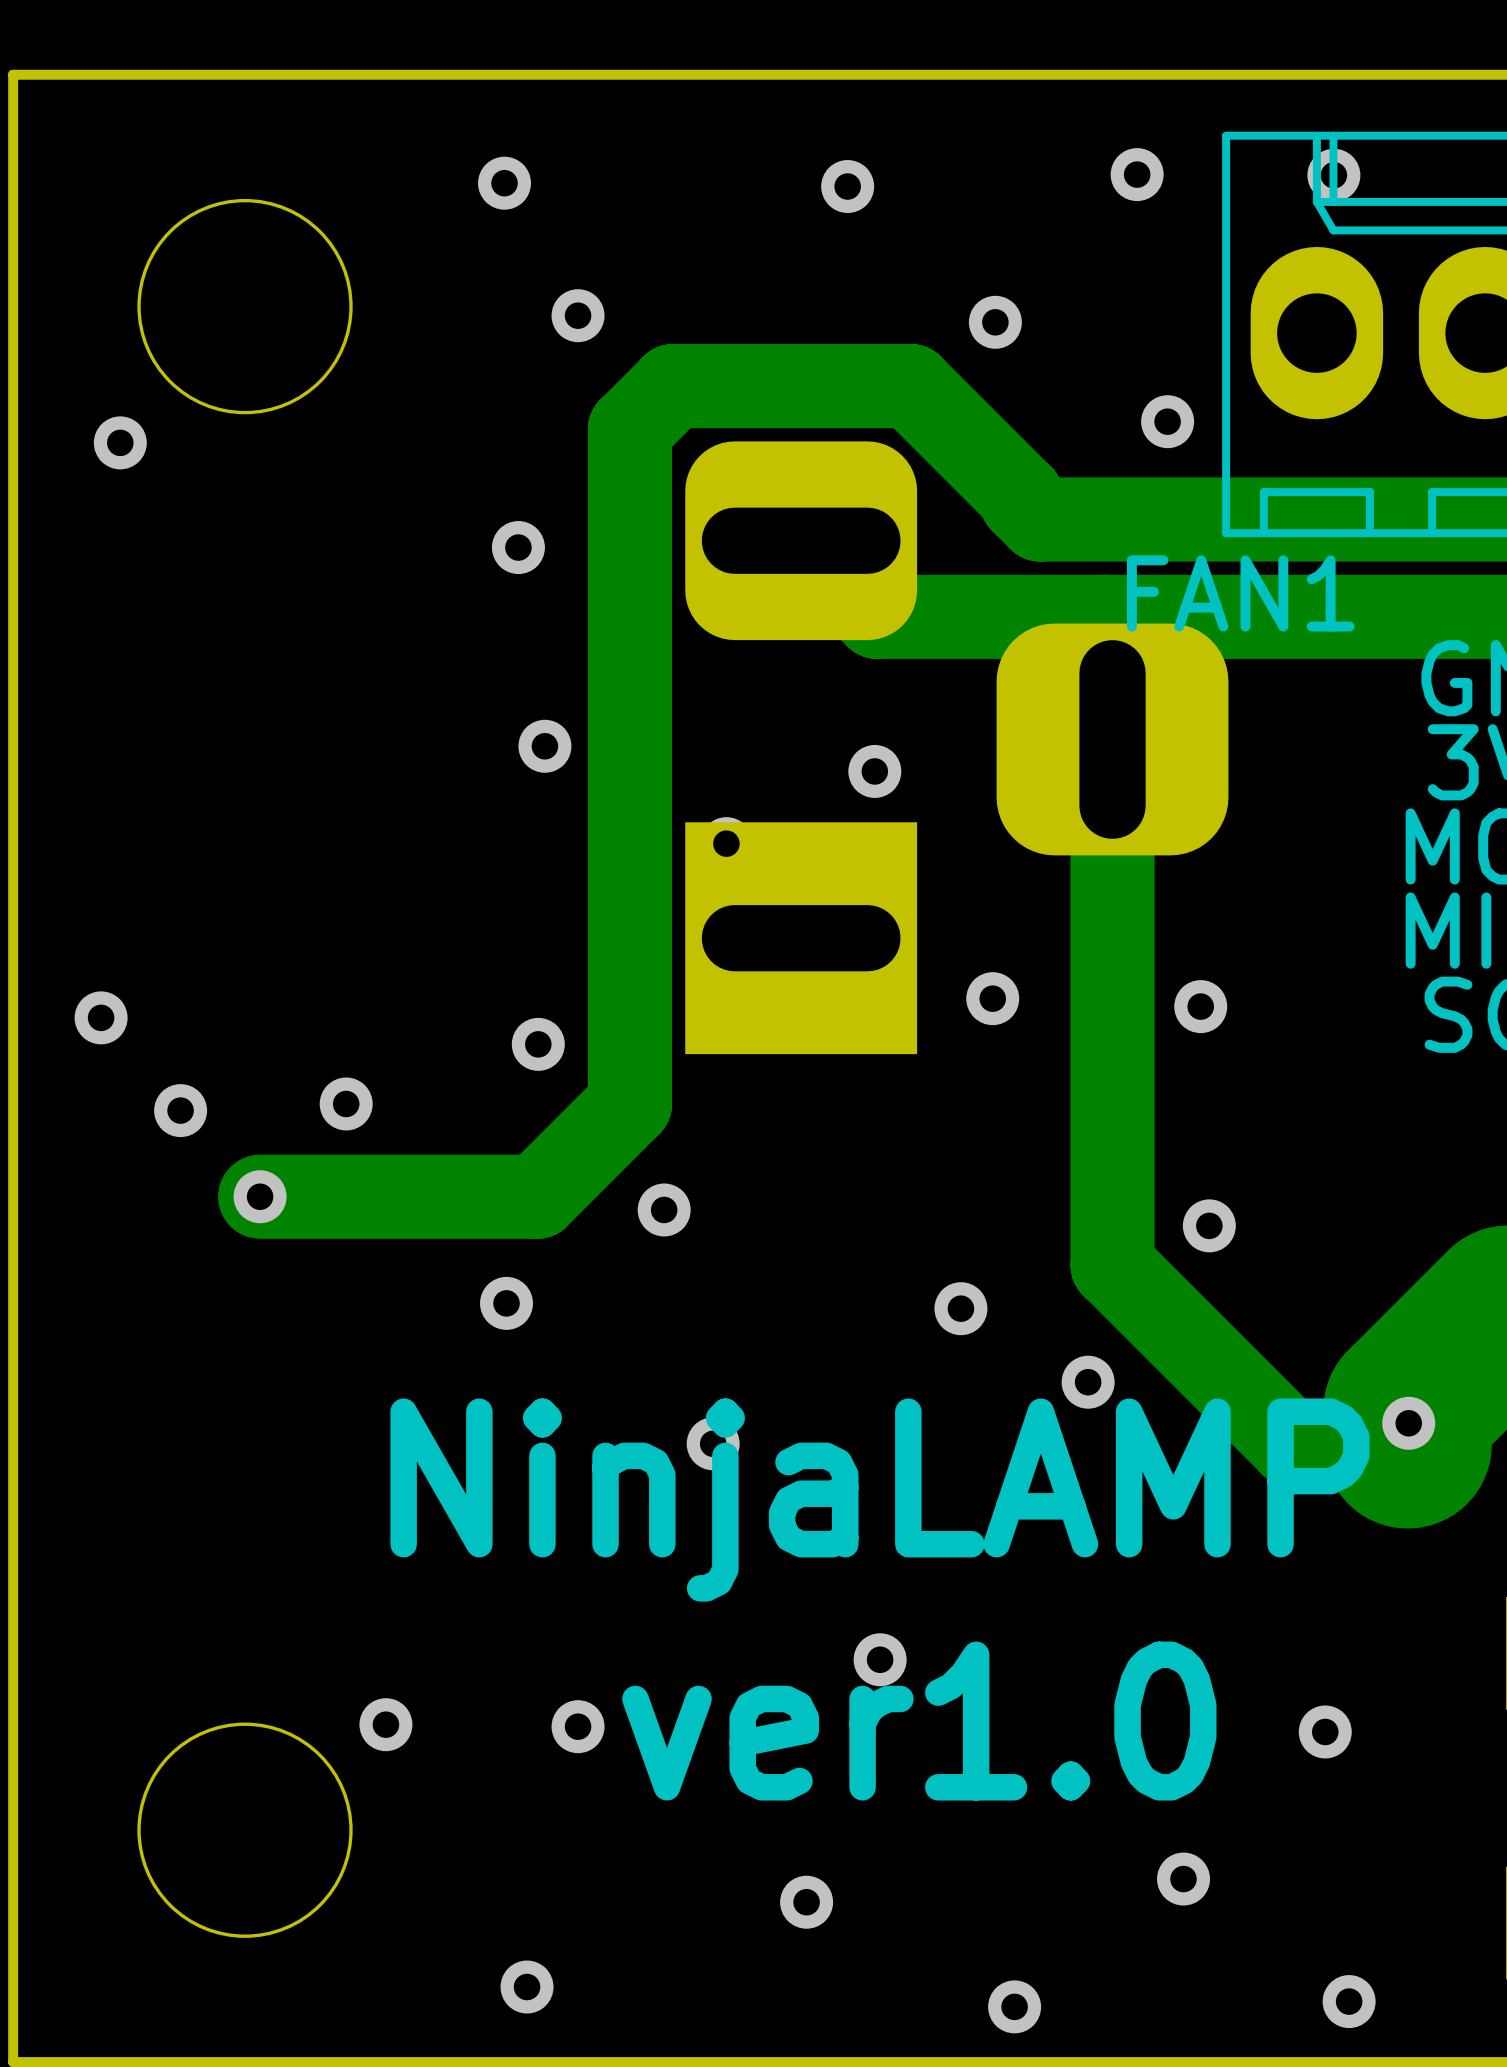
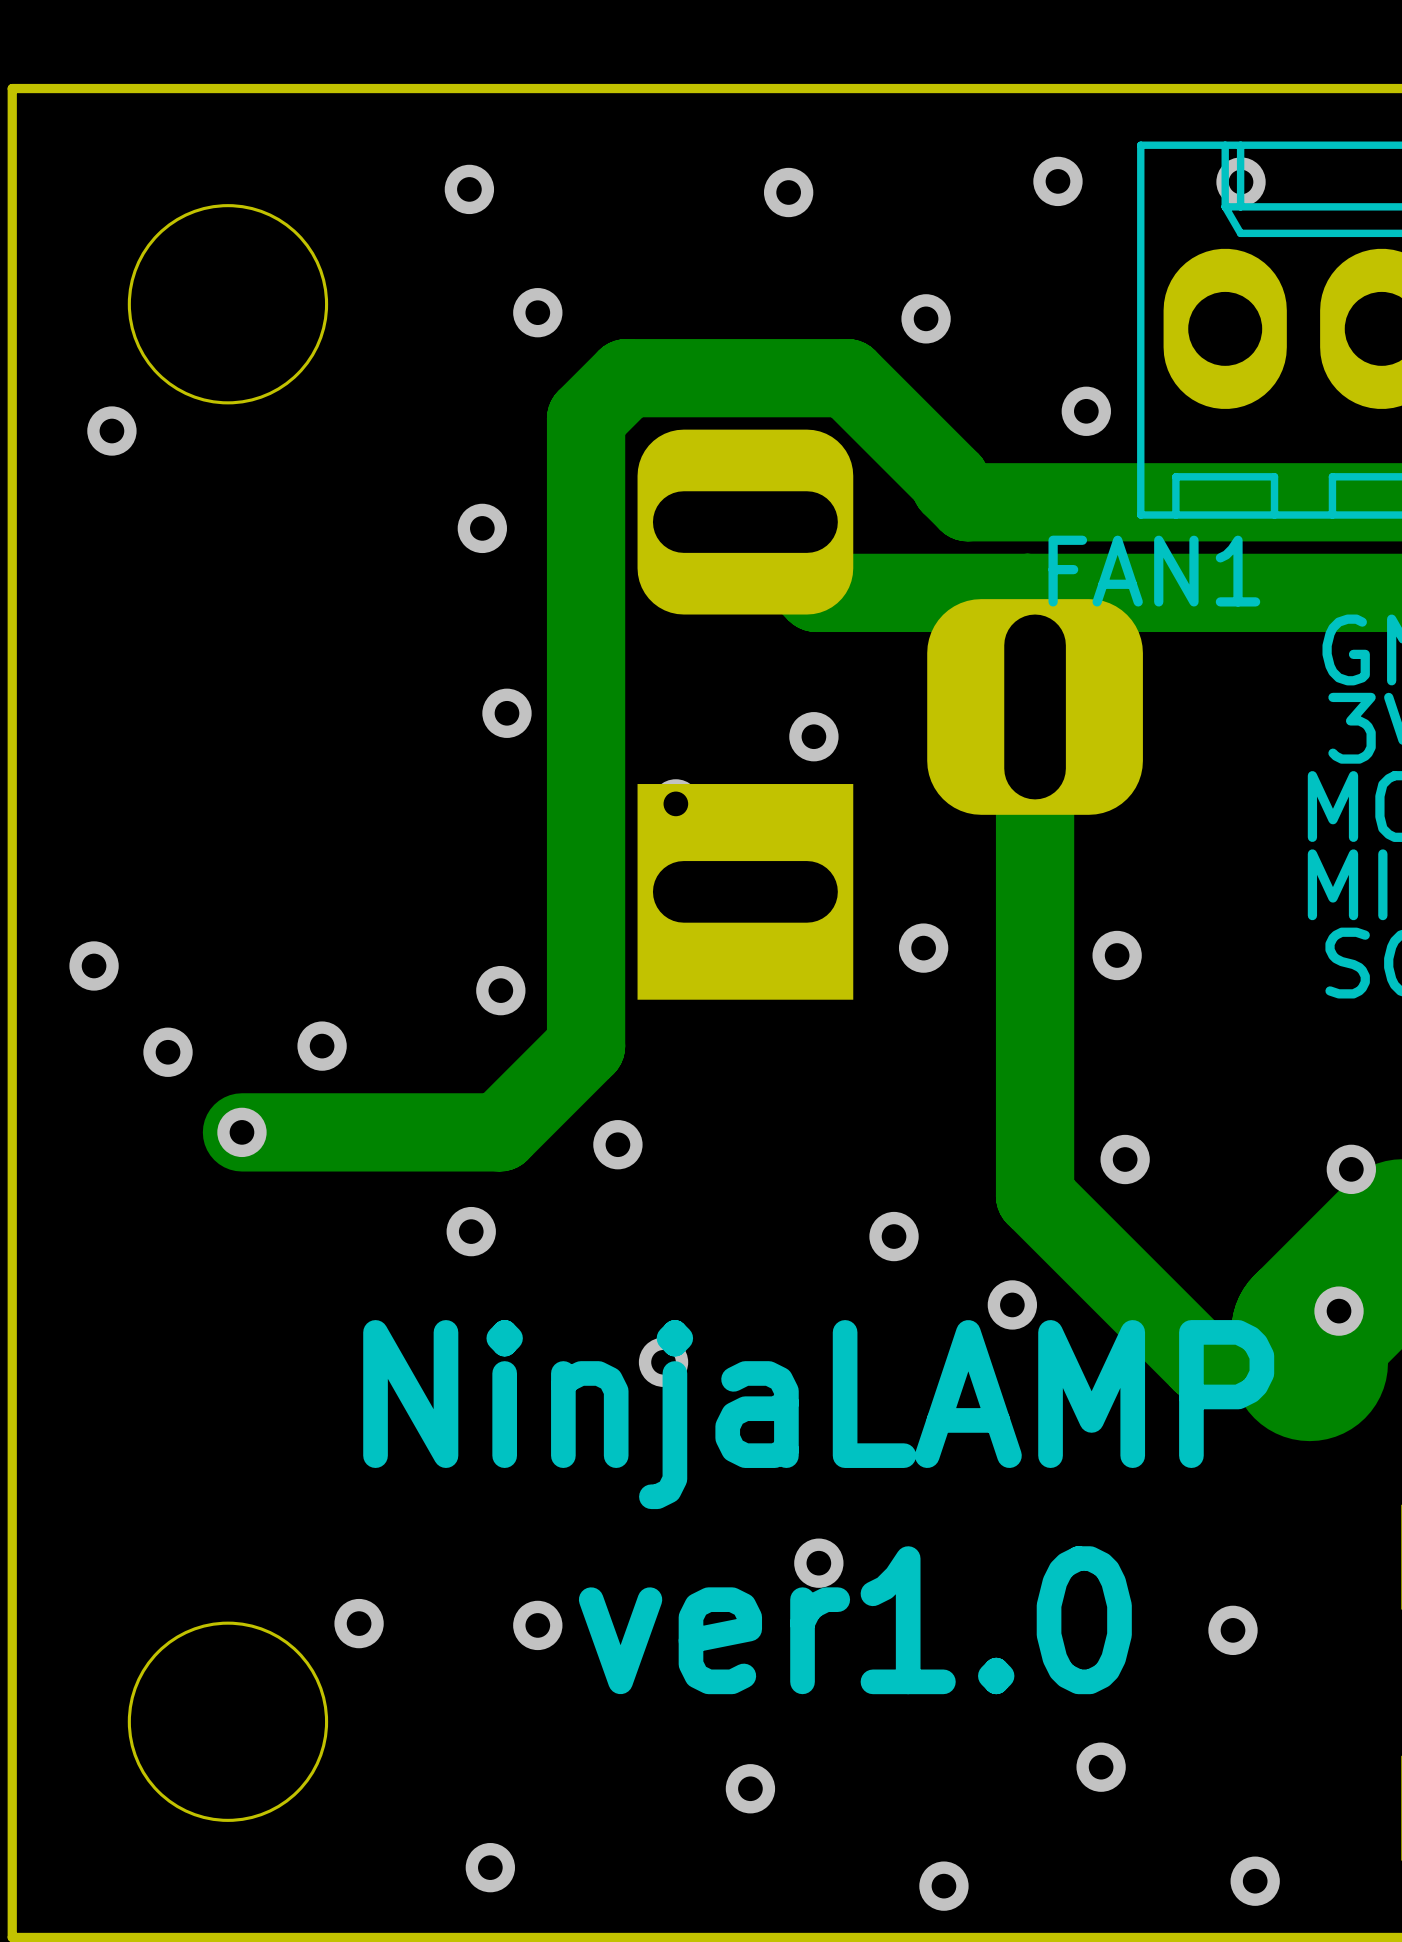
via: none -> (1351, 1169)
via position: (1408, 1423) -> (1339, 1311)

